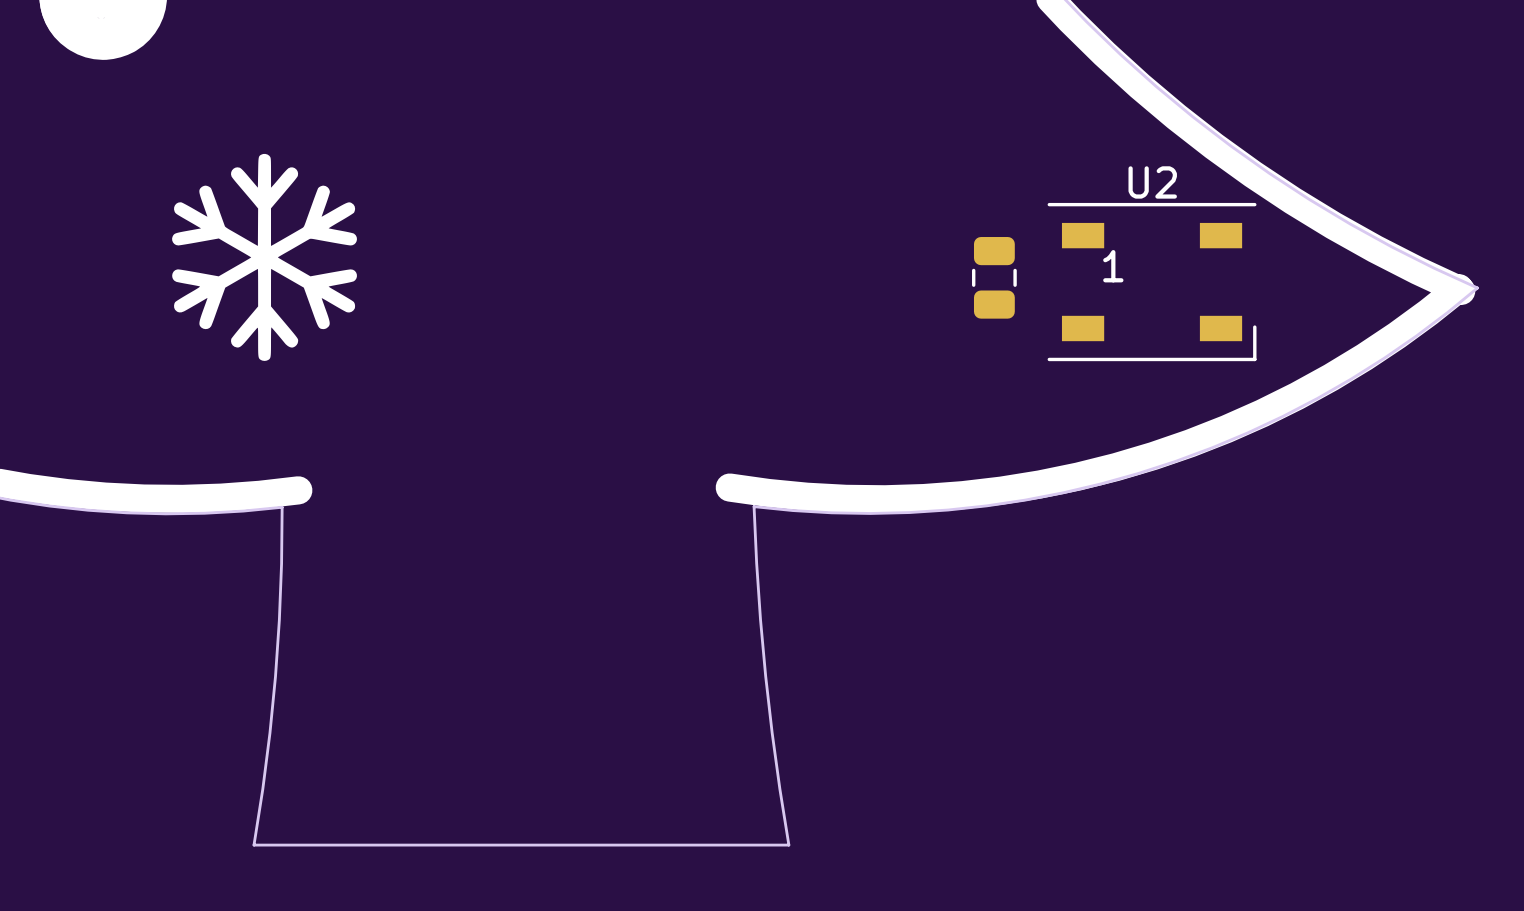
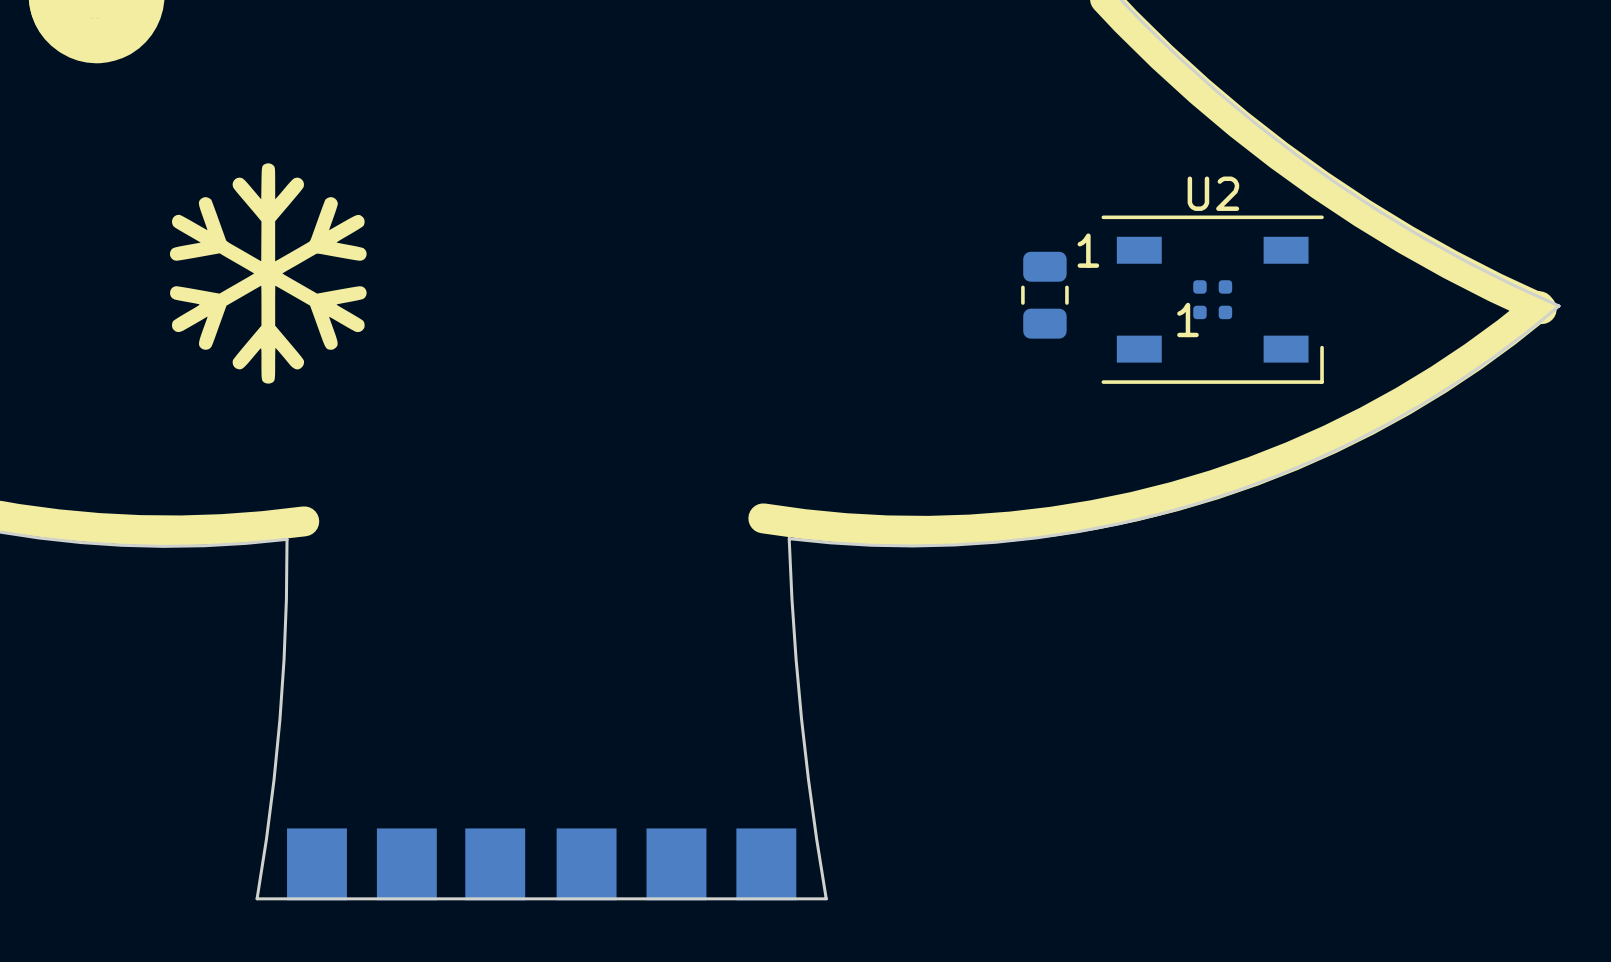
U2 footprint: [1047, 202, 1257, 362] -> [1101, 215, 1324, 384]
part: none -> (316, 864)
part: none -> (406, 864)
part: none -> (495, 864)
part: none -> (586, 864)
part: none -> (676, 864)
part: none -> (766, 864)

